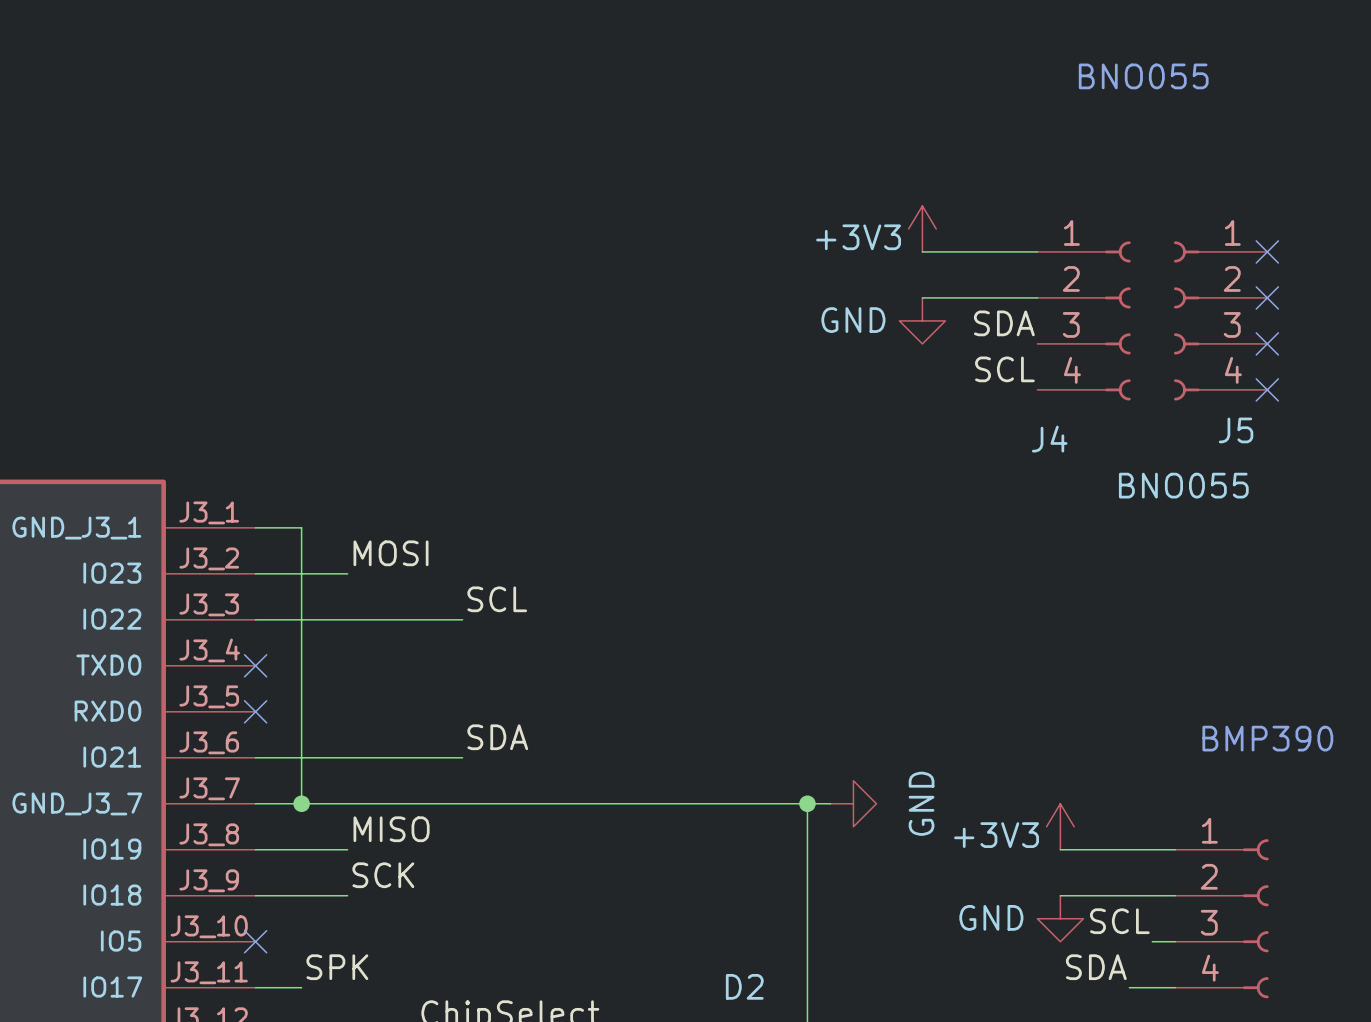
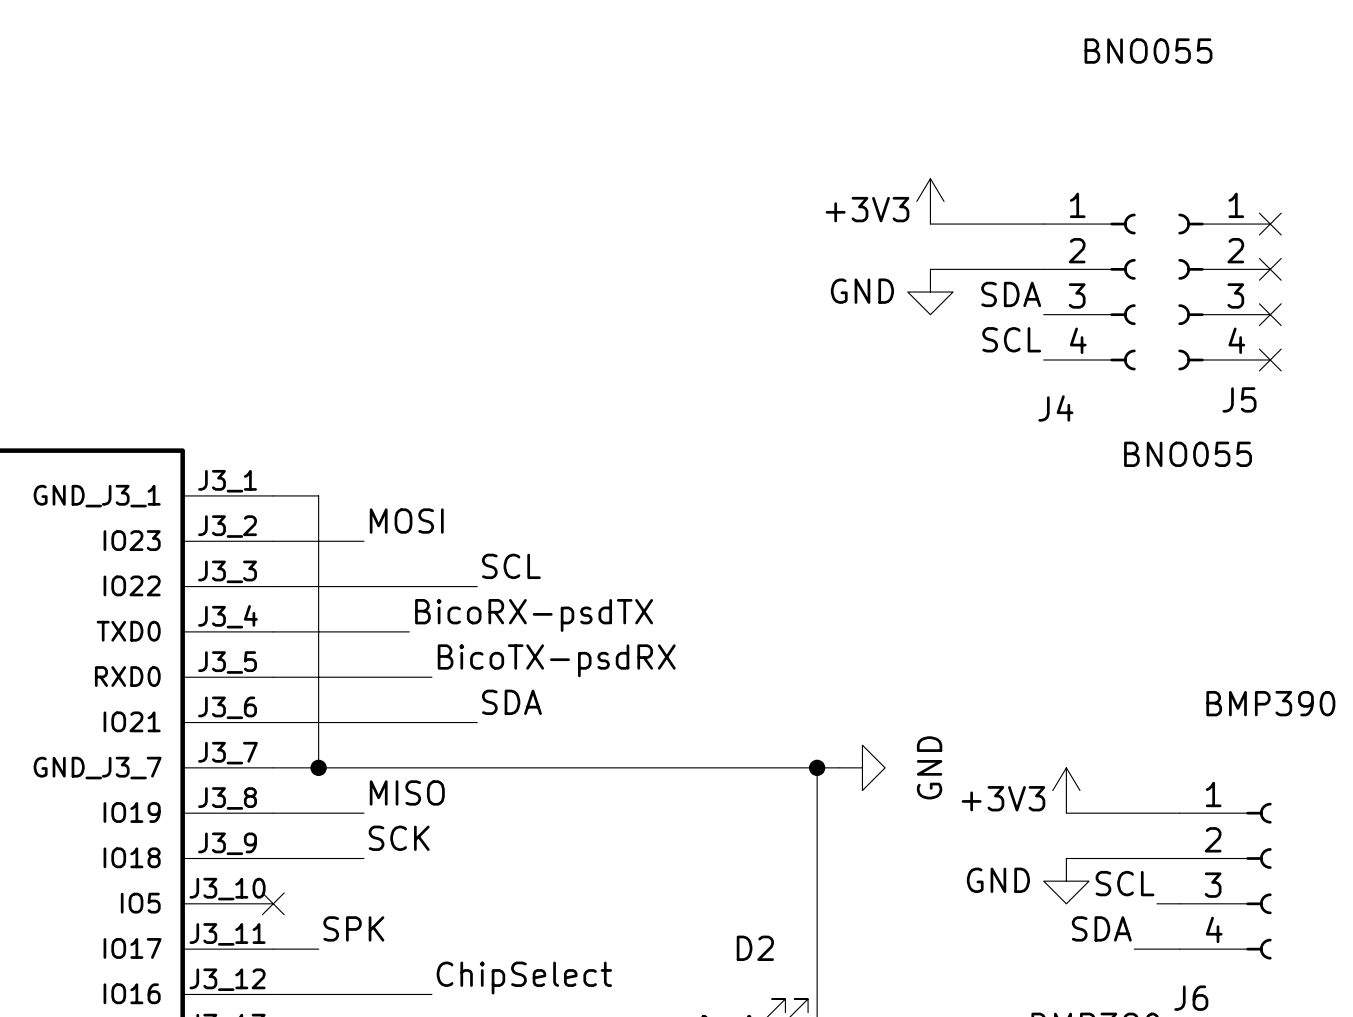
label: none -> BicoRX-psdTX (534, 615)
wire: none -> (273, 631) (409, 631)
no-connect mark: (255, 665) -> none
label: none -> BicoTX-psdRX (556, 660)
wire: none -> (273, 677) (431, 677)
no-connect mark: (255, 711) -> none

